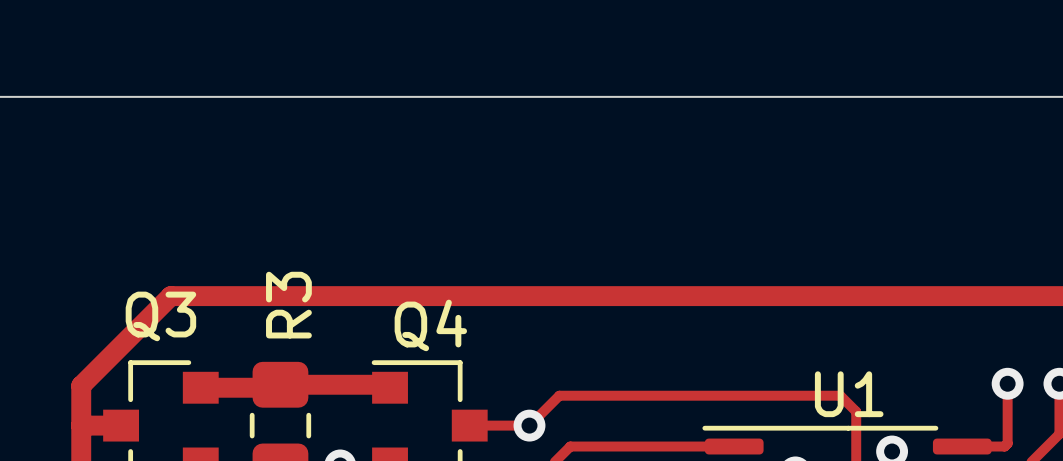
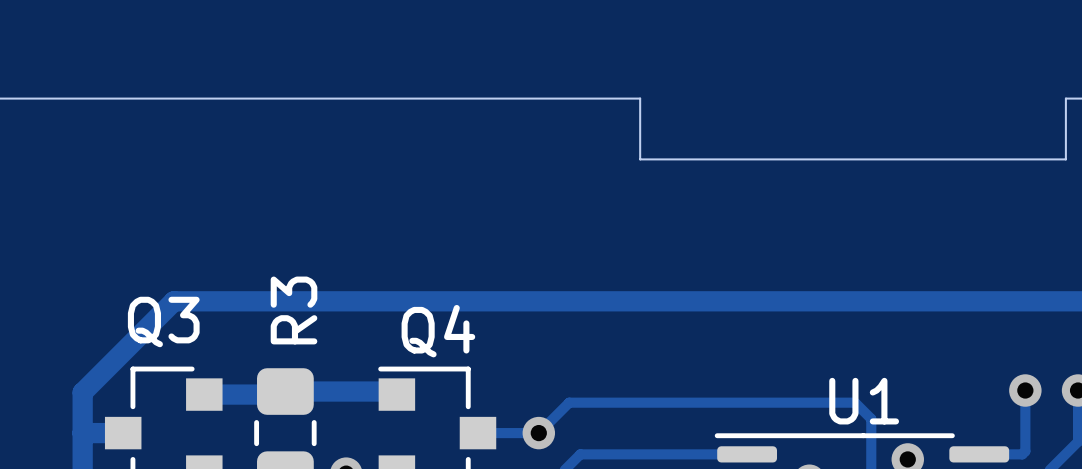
board edge: (629, 96) (1047, 96) -> (640, 98) (640, 159) (1065, 159) (1065, 98)

